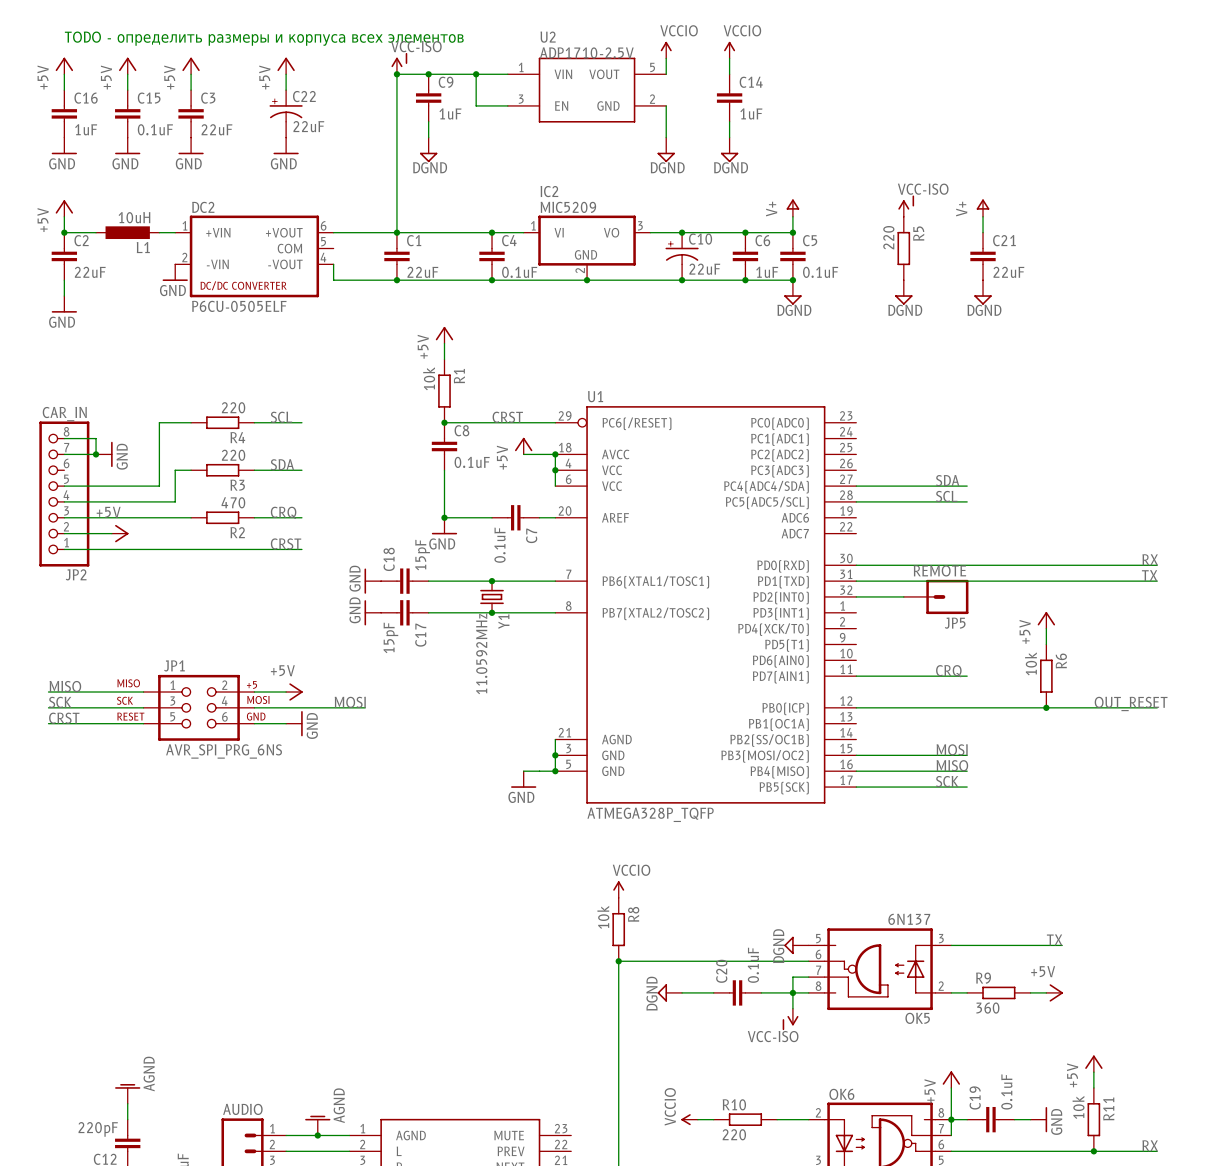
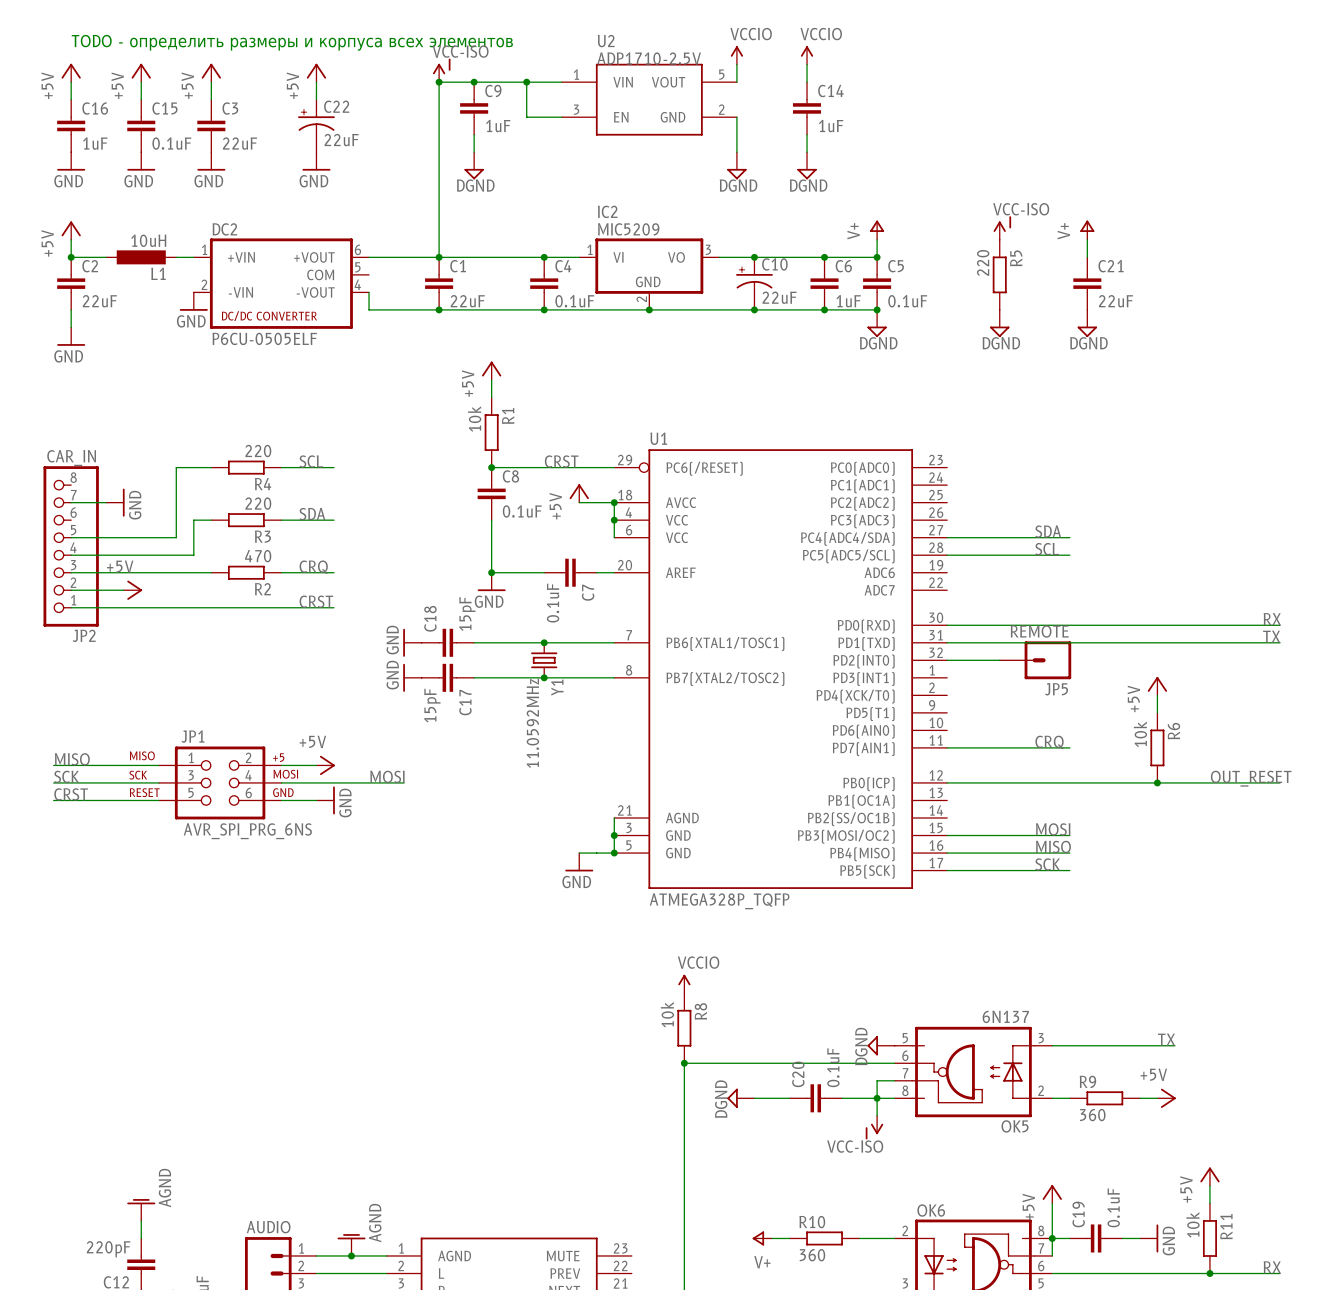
wire: (64, 438) (96, 438) (96, 454) -> none
junction: (96, 454) -> none
power symbol: VCCIO (689, 1119) -> V+ (762, 1238)
R10 value: 220 (734, 1134) -> 360 (812, 1255)

